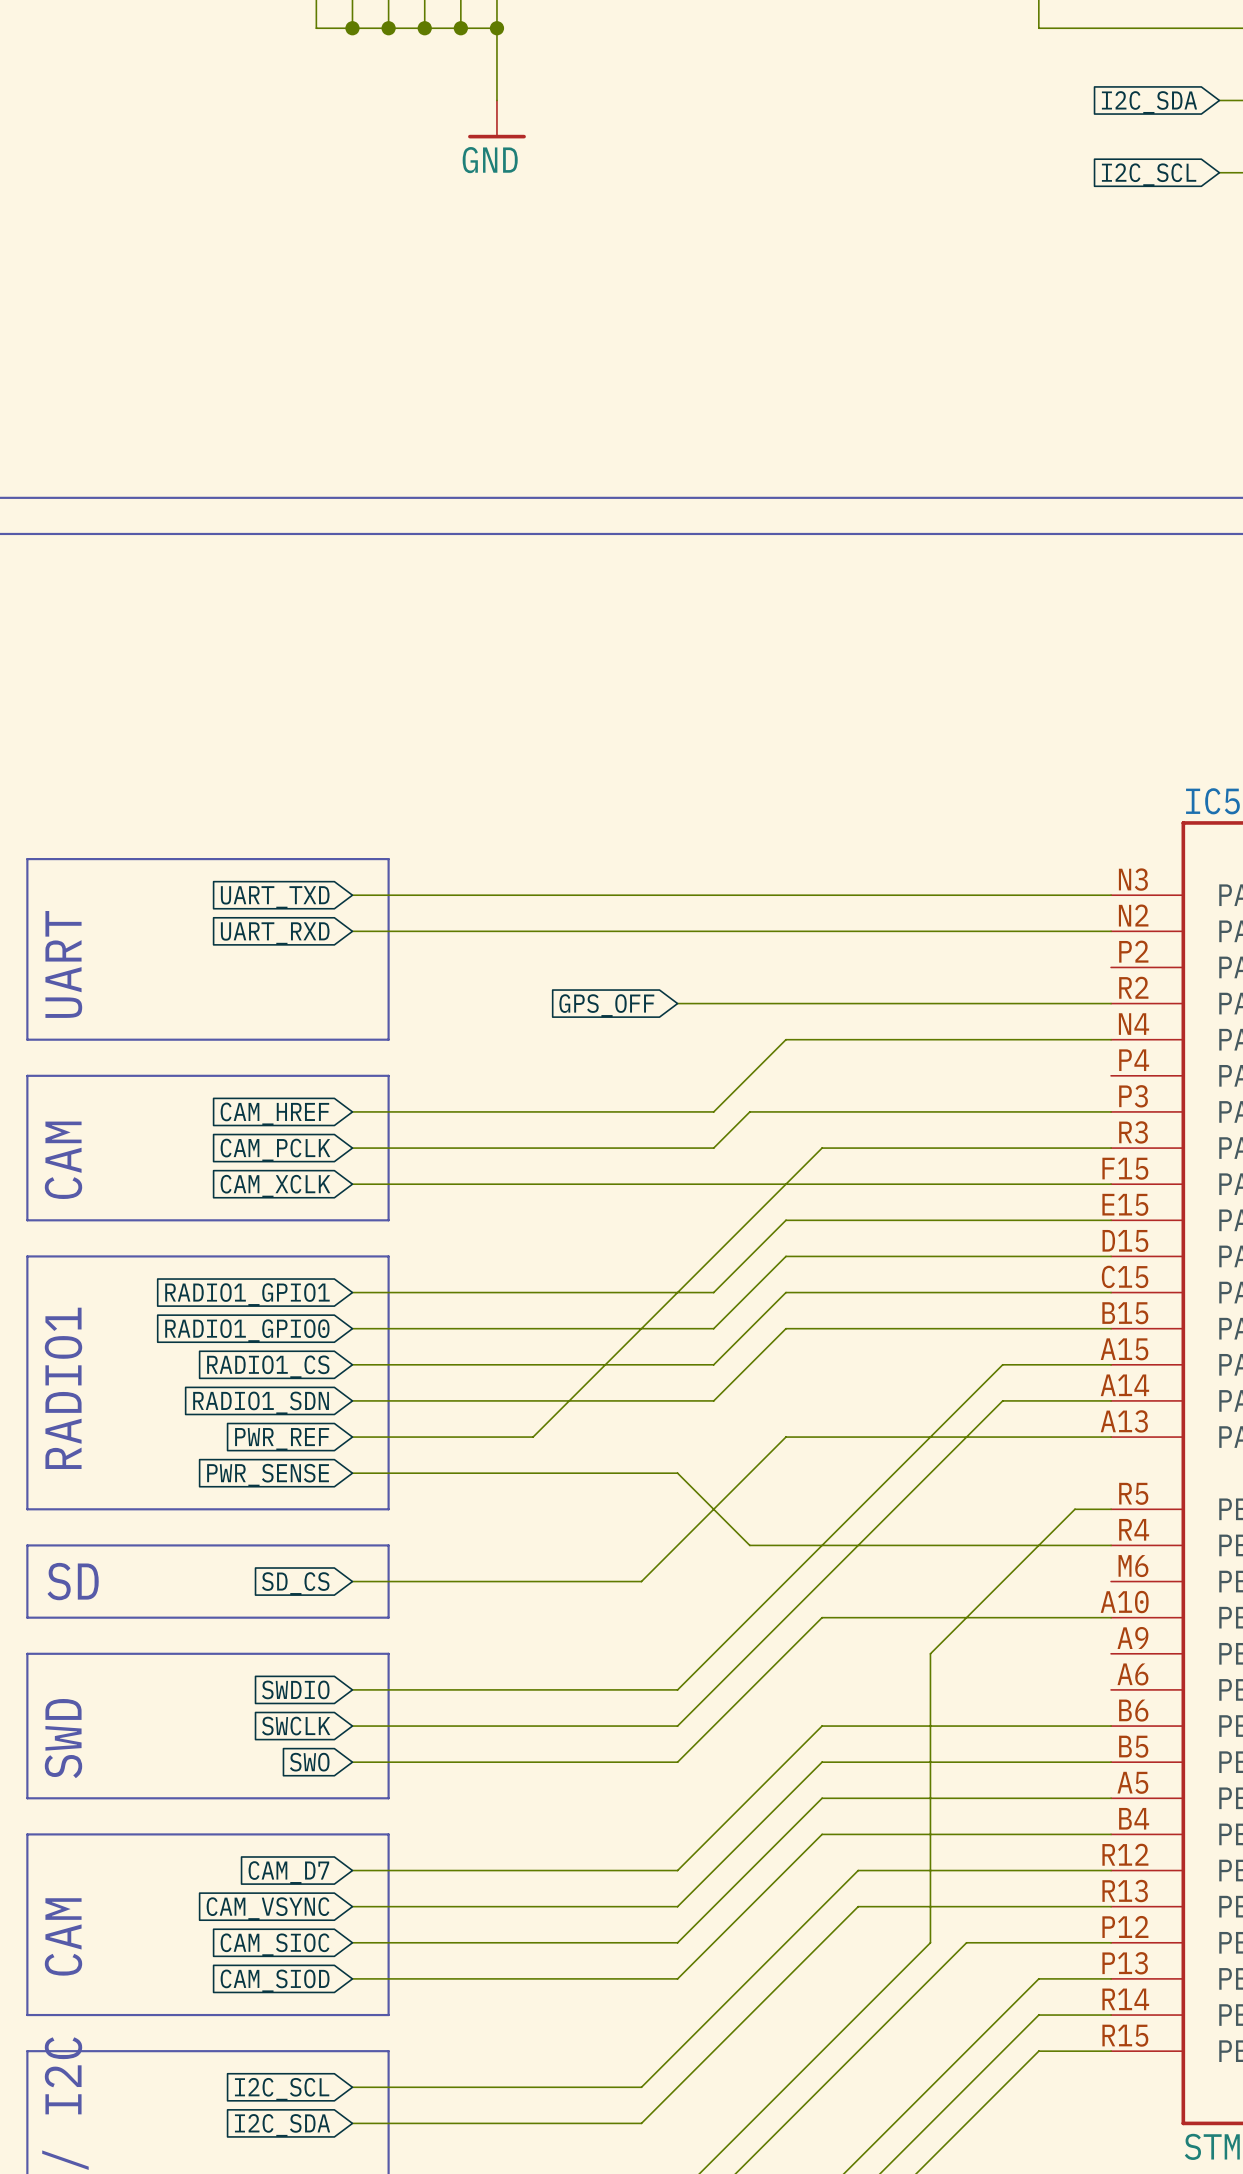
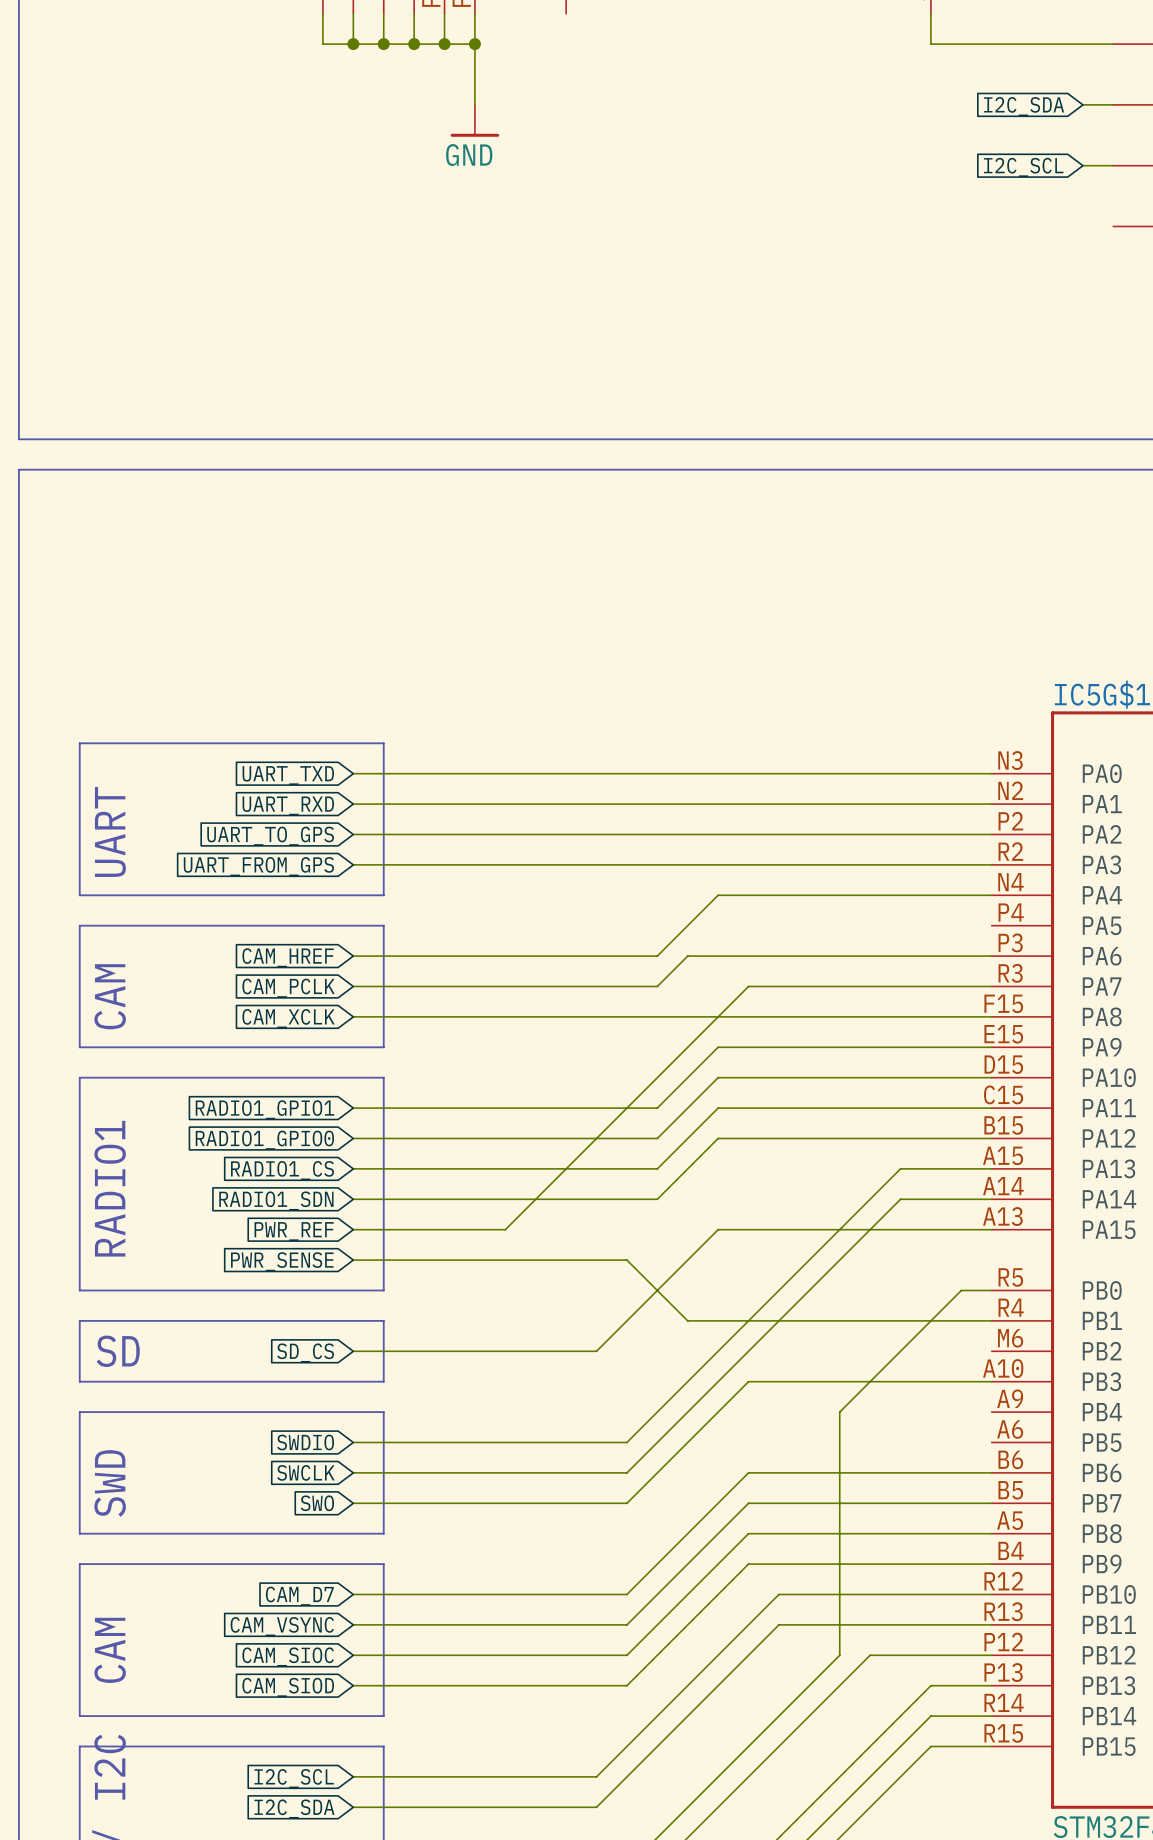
wire: none -> (353, 834) (991, 834)
global label: none -> UART_TO_GPS (270, 836)
wire: none -> (353, 864) (626, 864)
global label: none -> UART_FROM_GPS (258, 866)
global label: GPS_OFF (606, 1005) -> none

